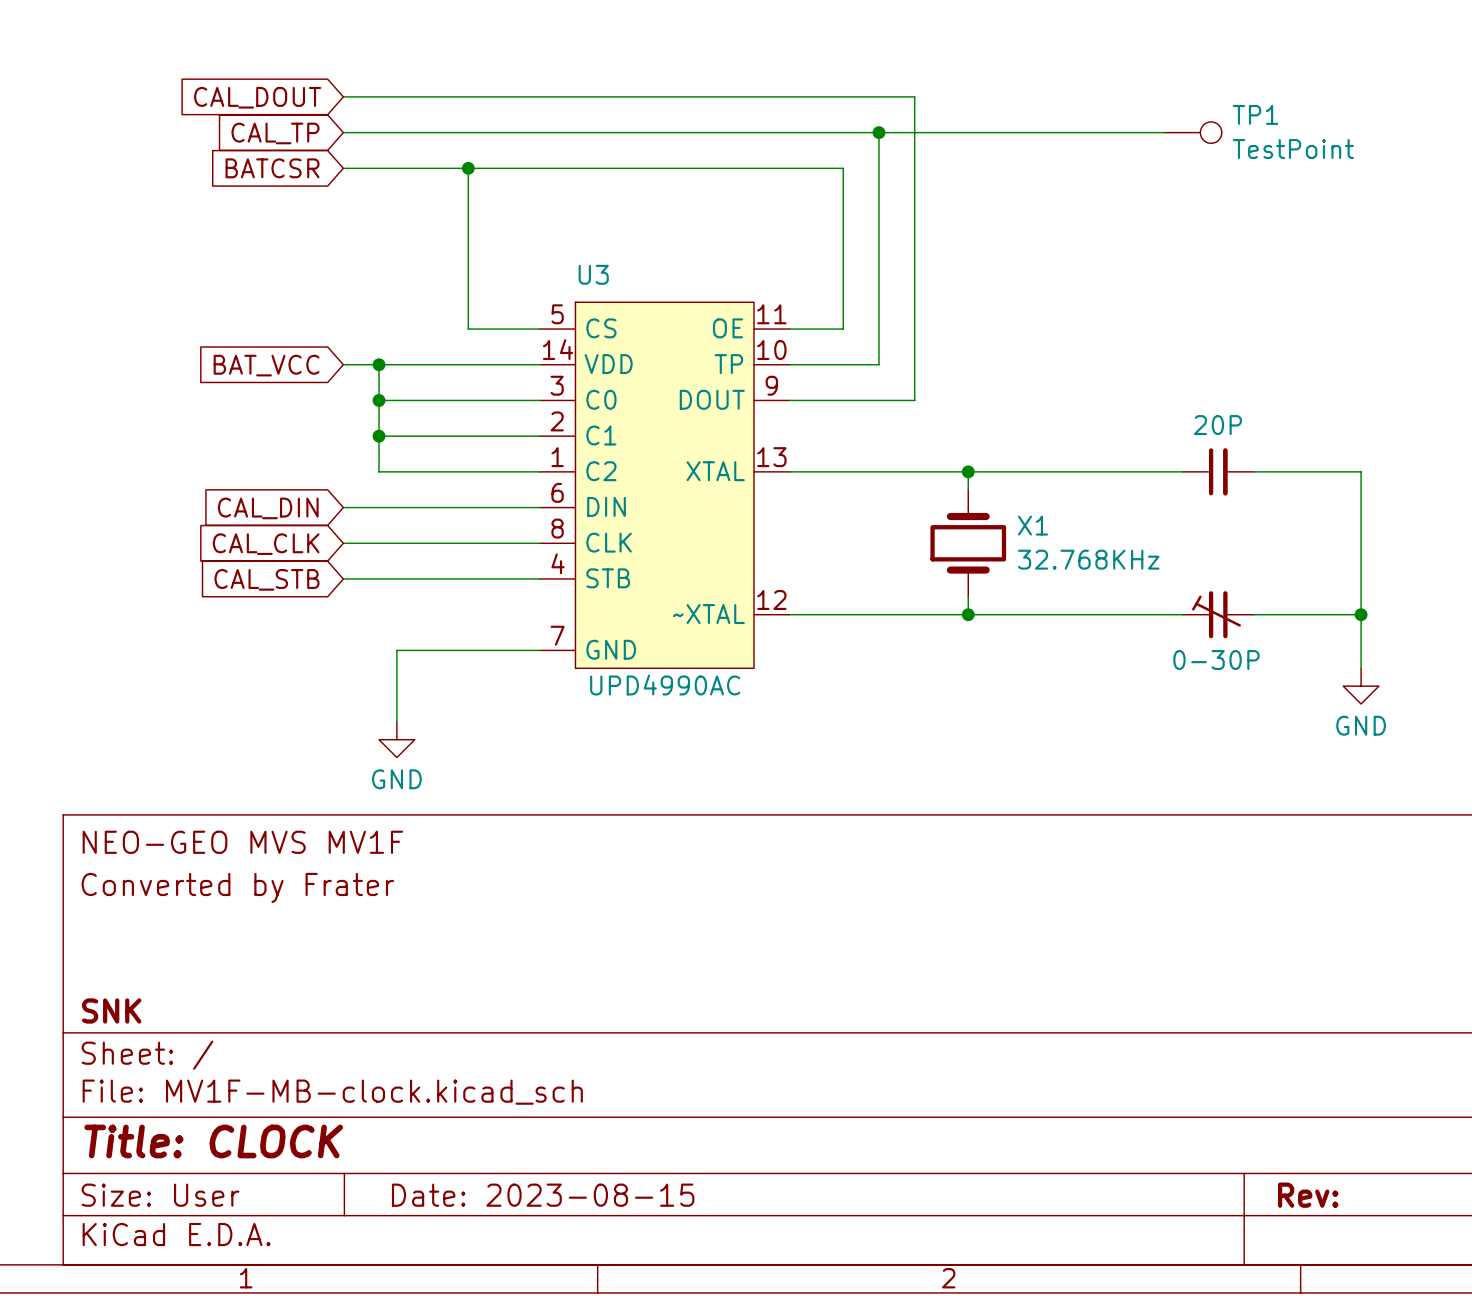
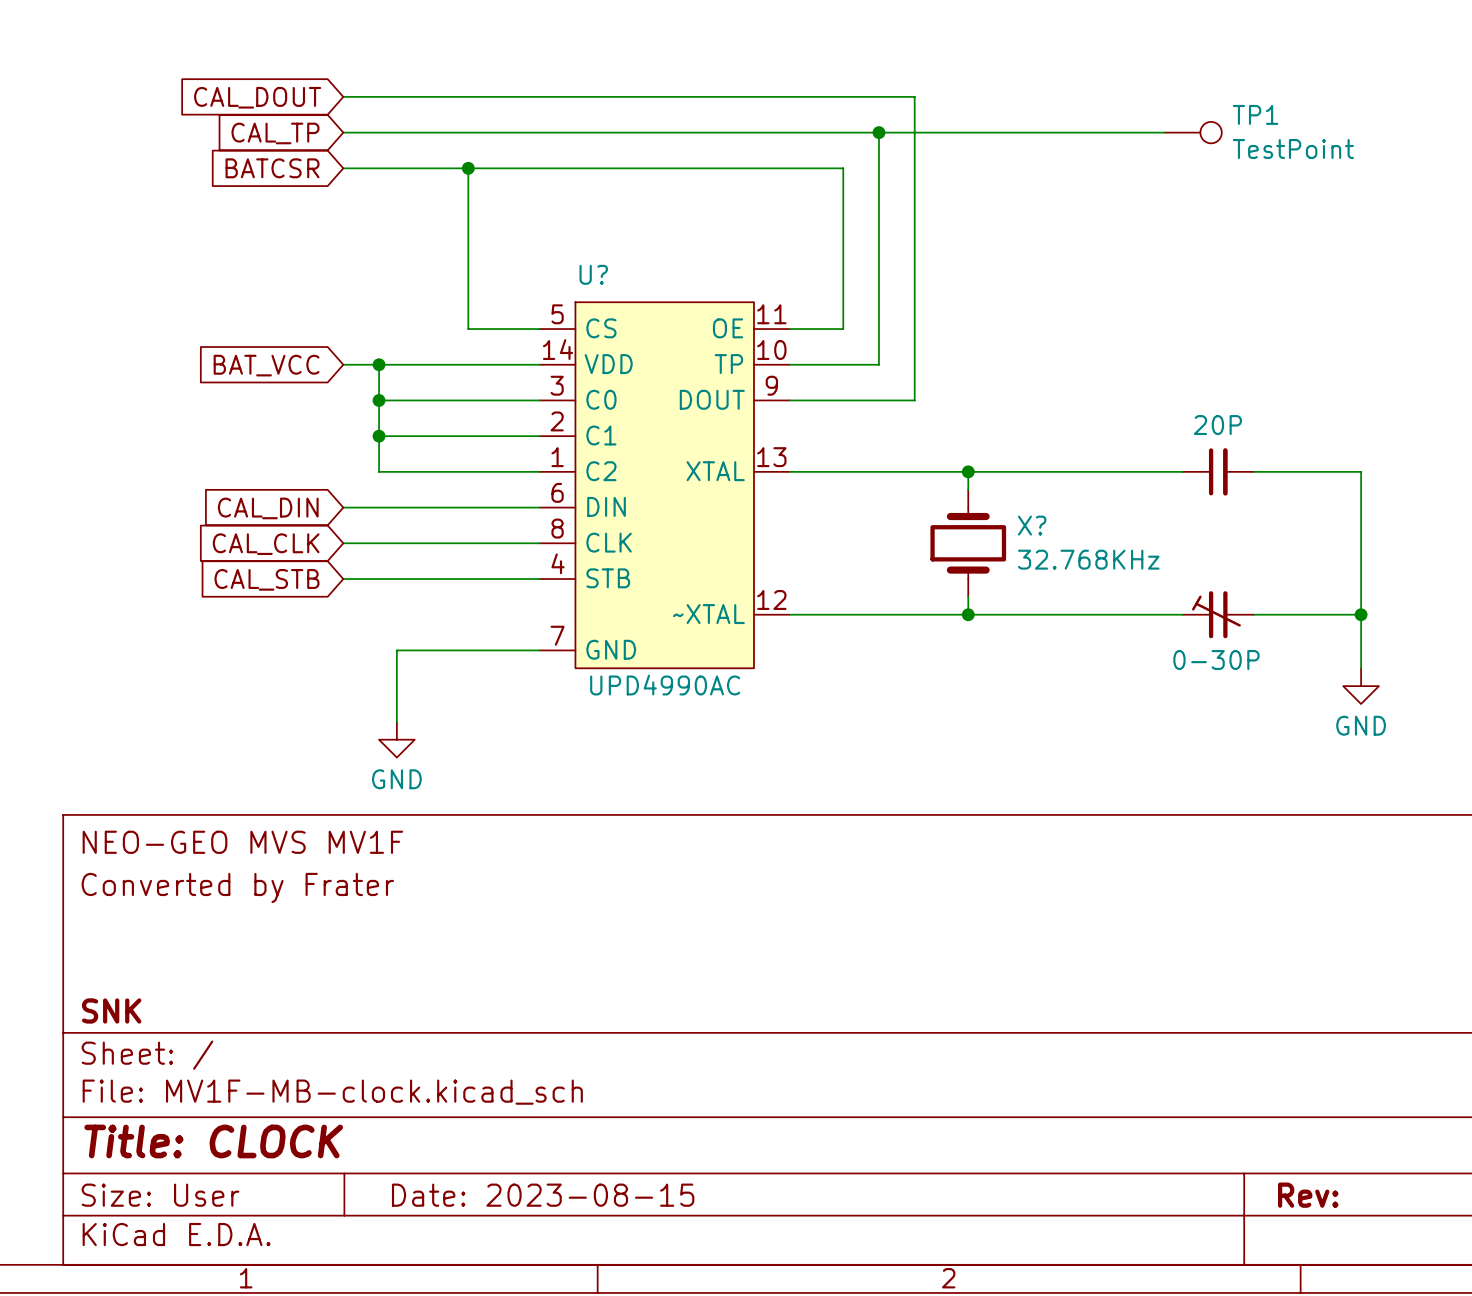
U3 name: U3 (593, 274) -> U? (593, 274)
X1 name: X1 (1033, 525) -> X? (1032, 525)

